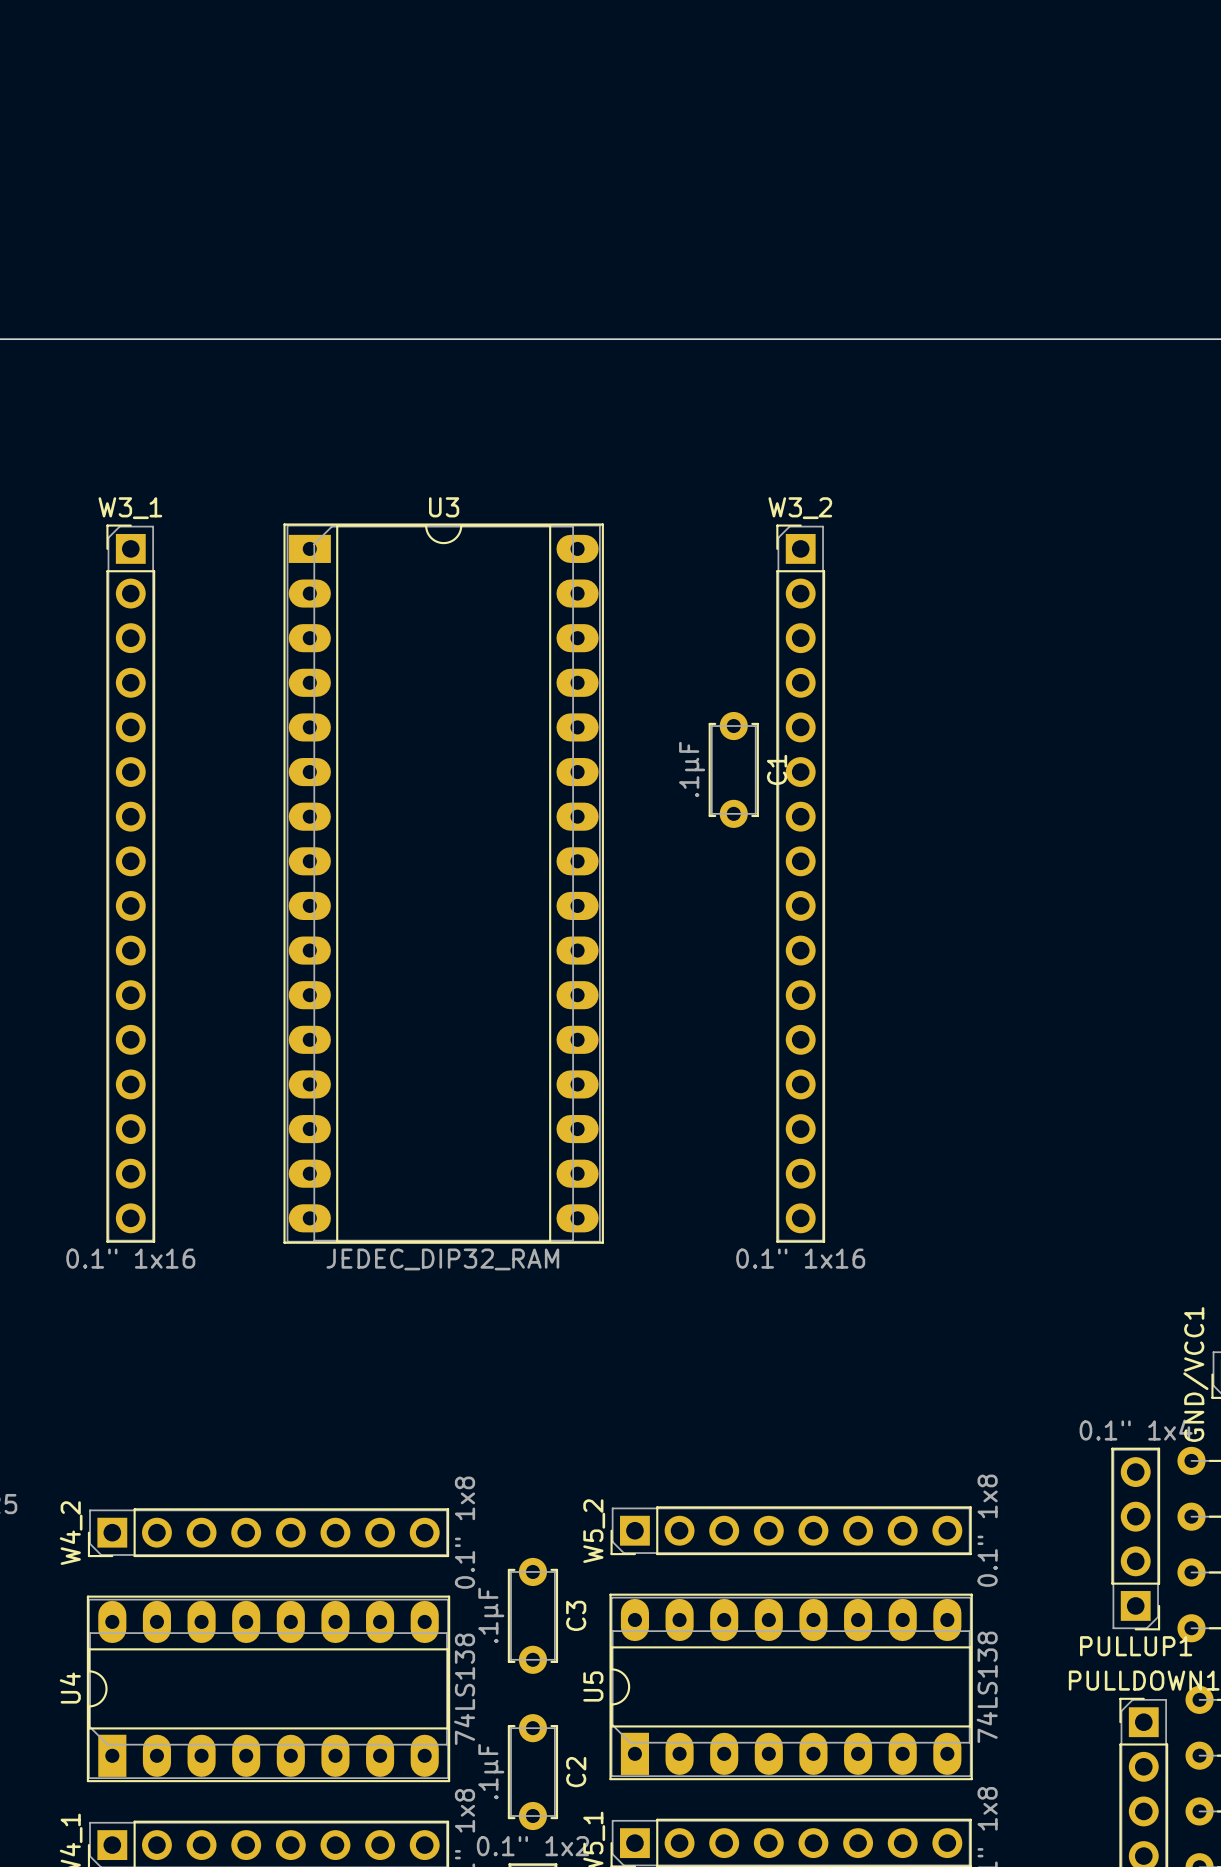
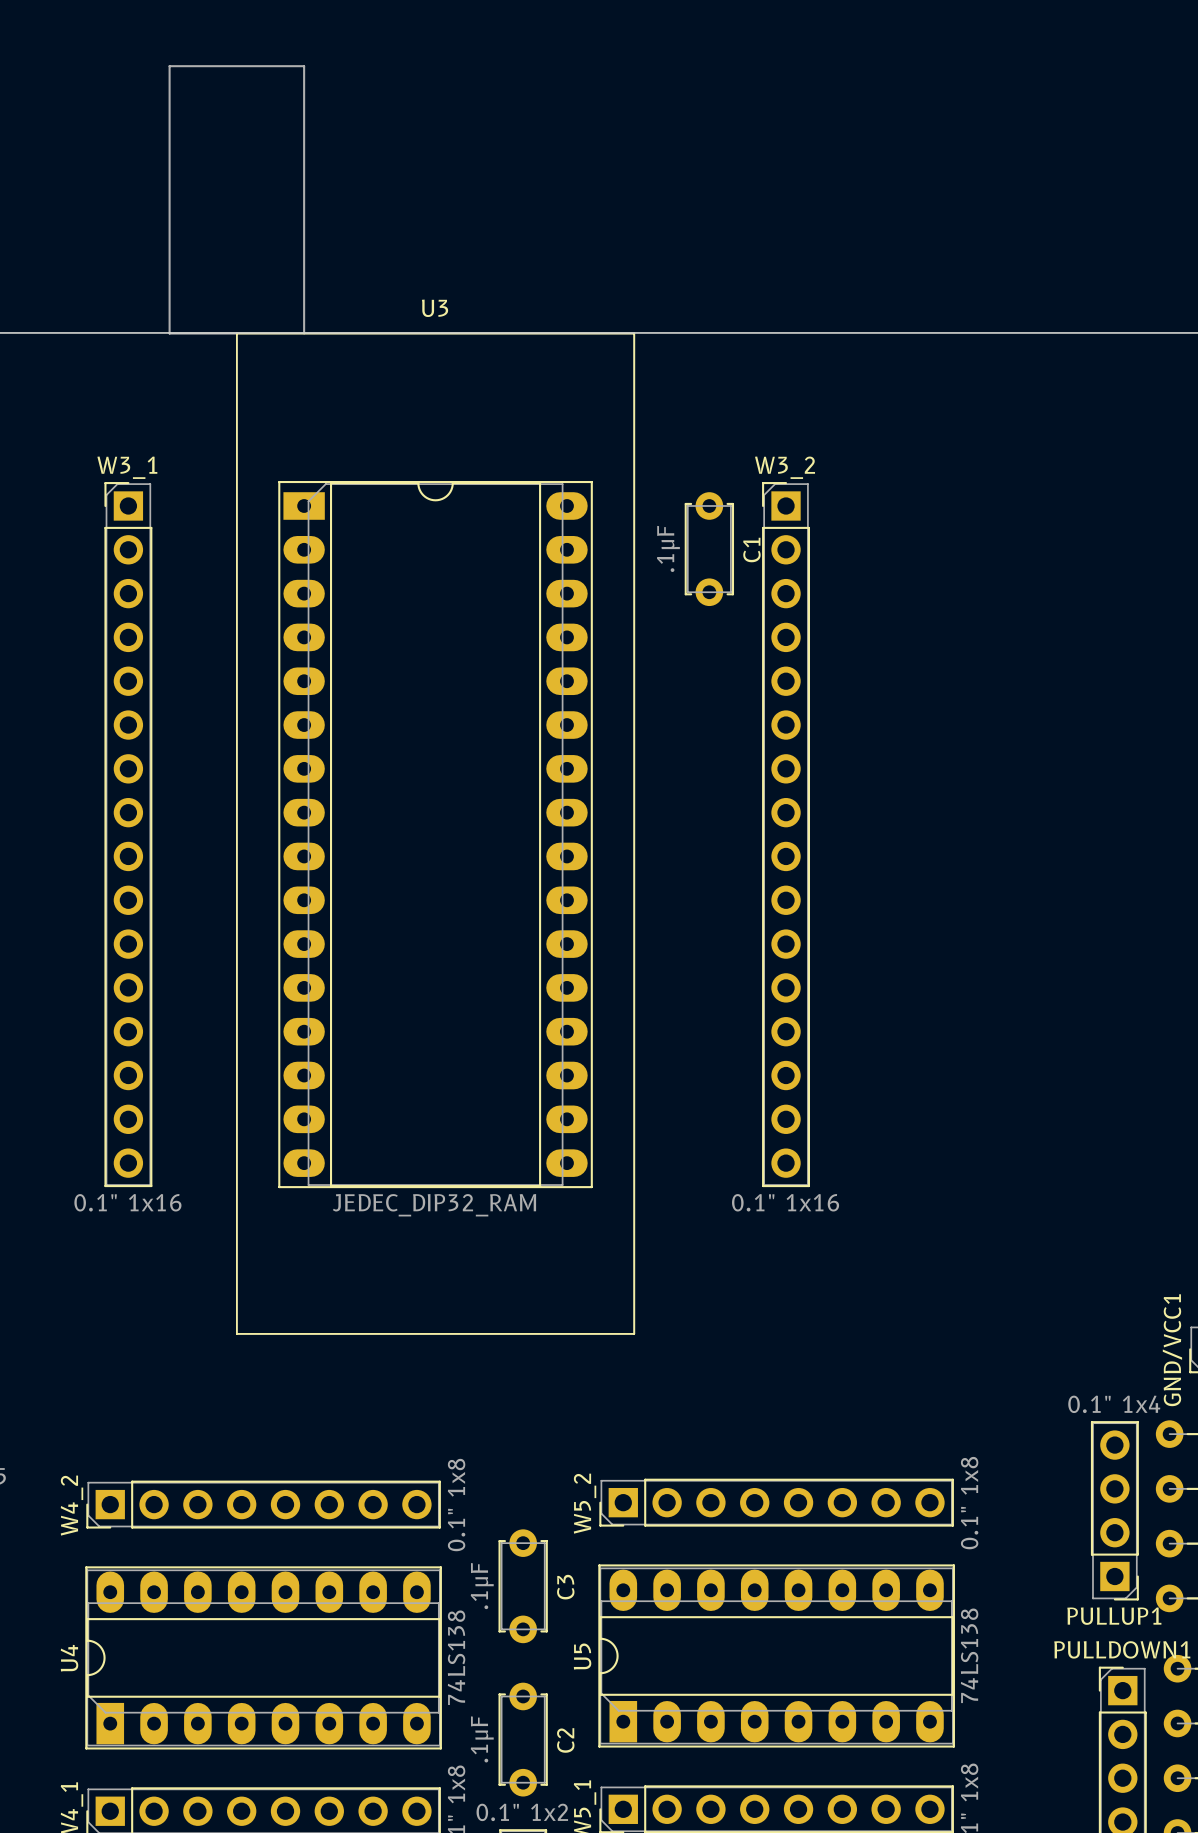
U3 name position: U3 (444, 507) -> U3 (435, 308)
U3 footprint: [283, 523, 604, 1244] -> [168, 65, 636, 1335]
C1 position: (733, 769) -> (709, 549)
W3_1 position: (130, 883) -> (128, 834)
W3_2 position: (800, 883) -> (786, 834)
U3 value position: JEDEC_DIP32_RAM (442, 1259) -> JEDEC_DIP32_RAM (434, 1205)

